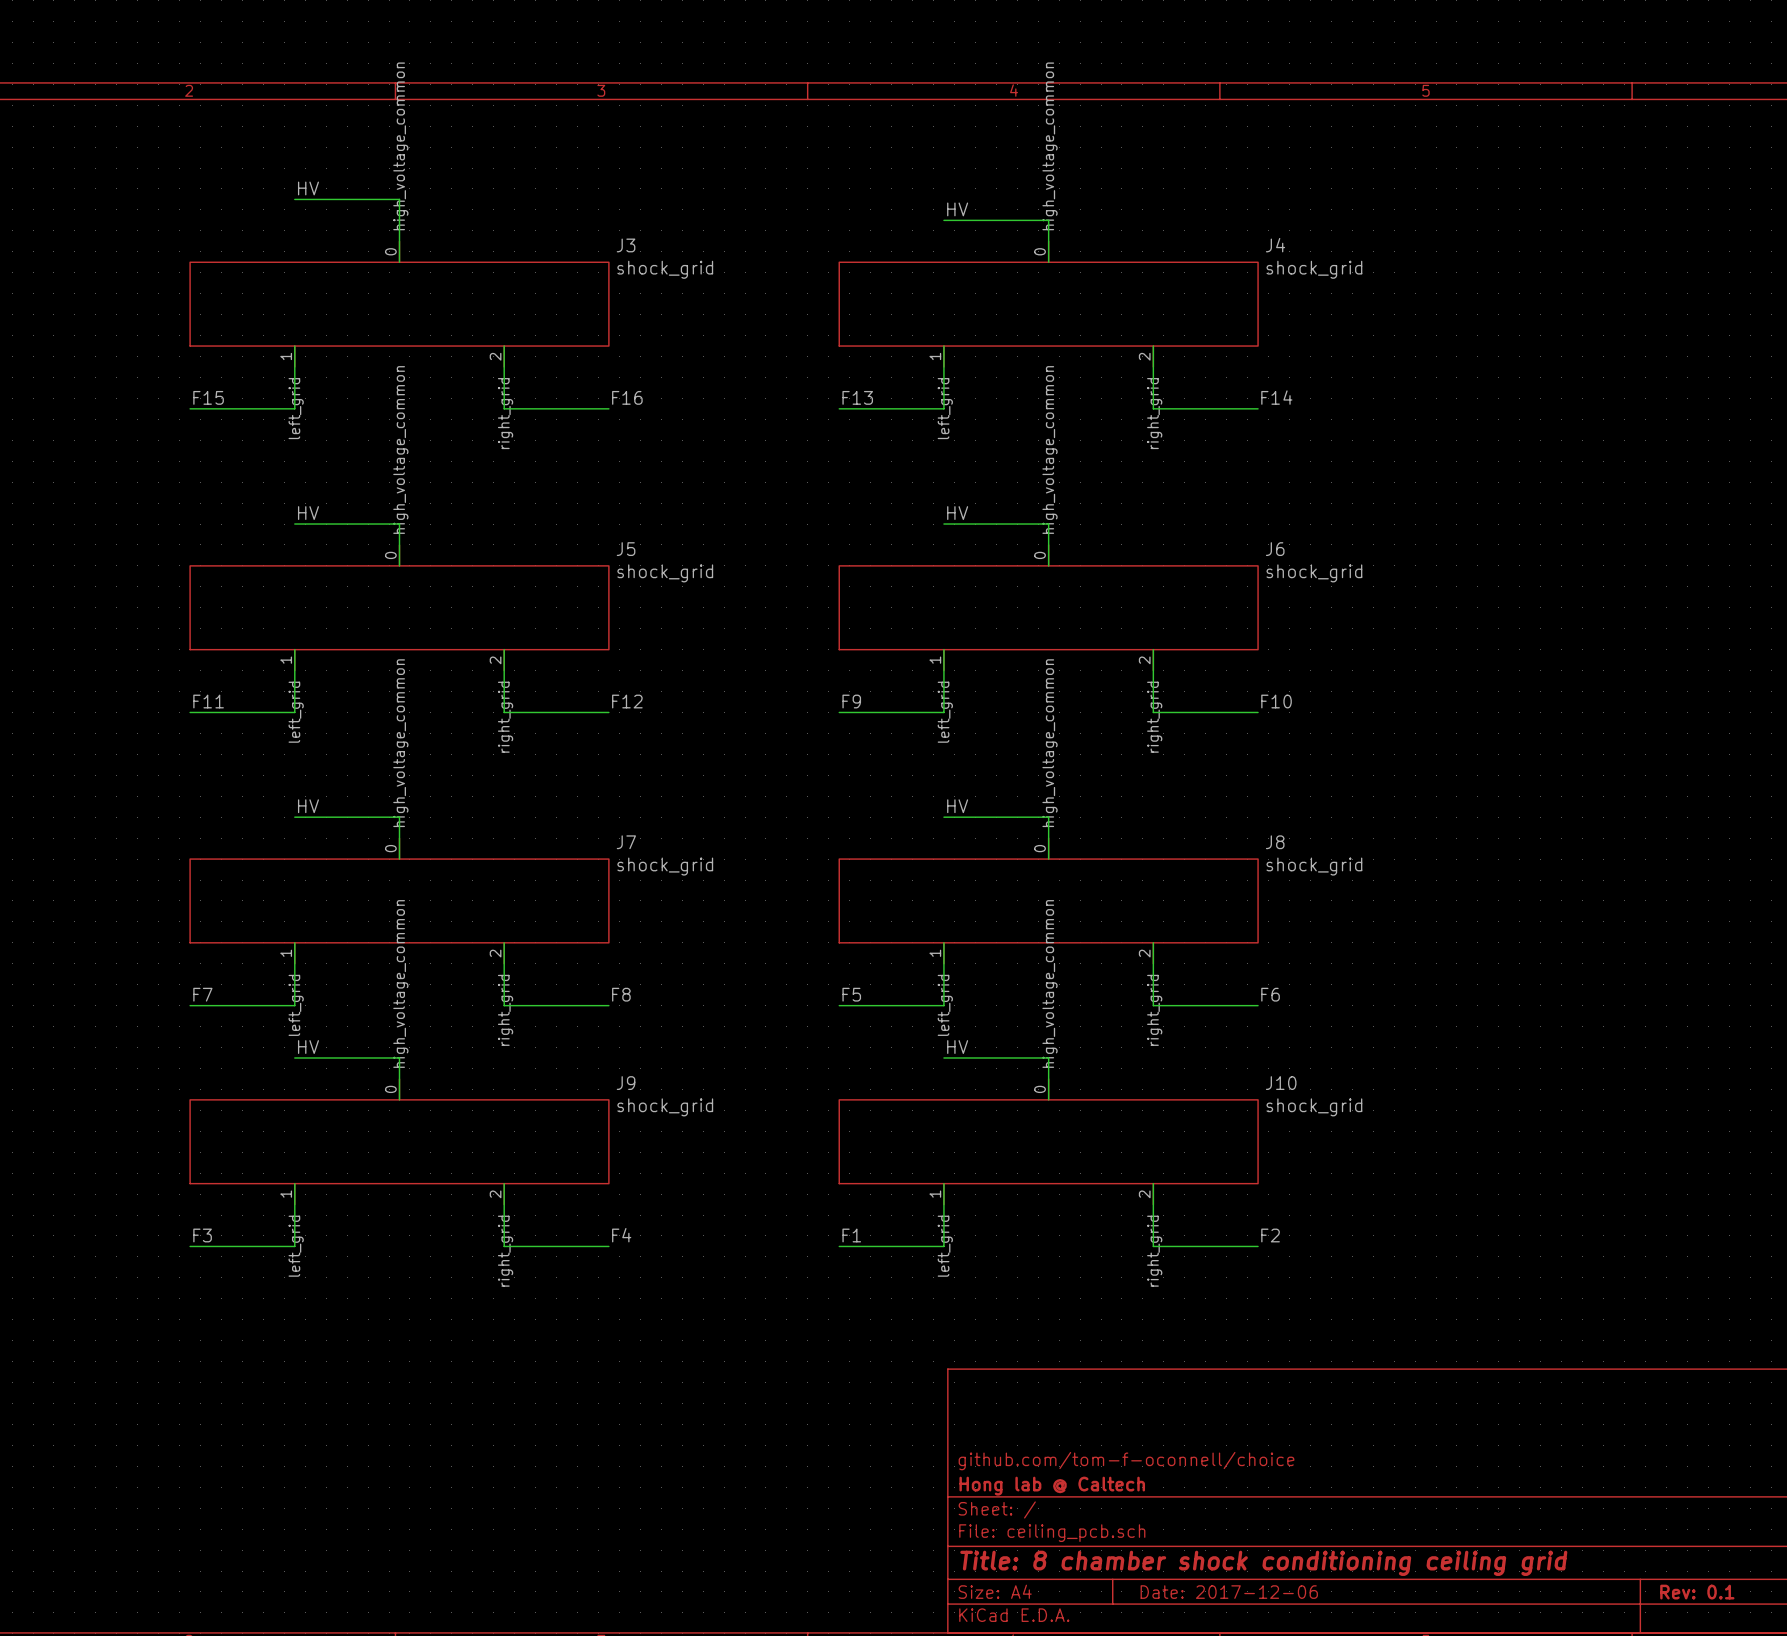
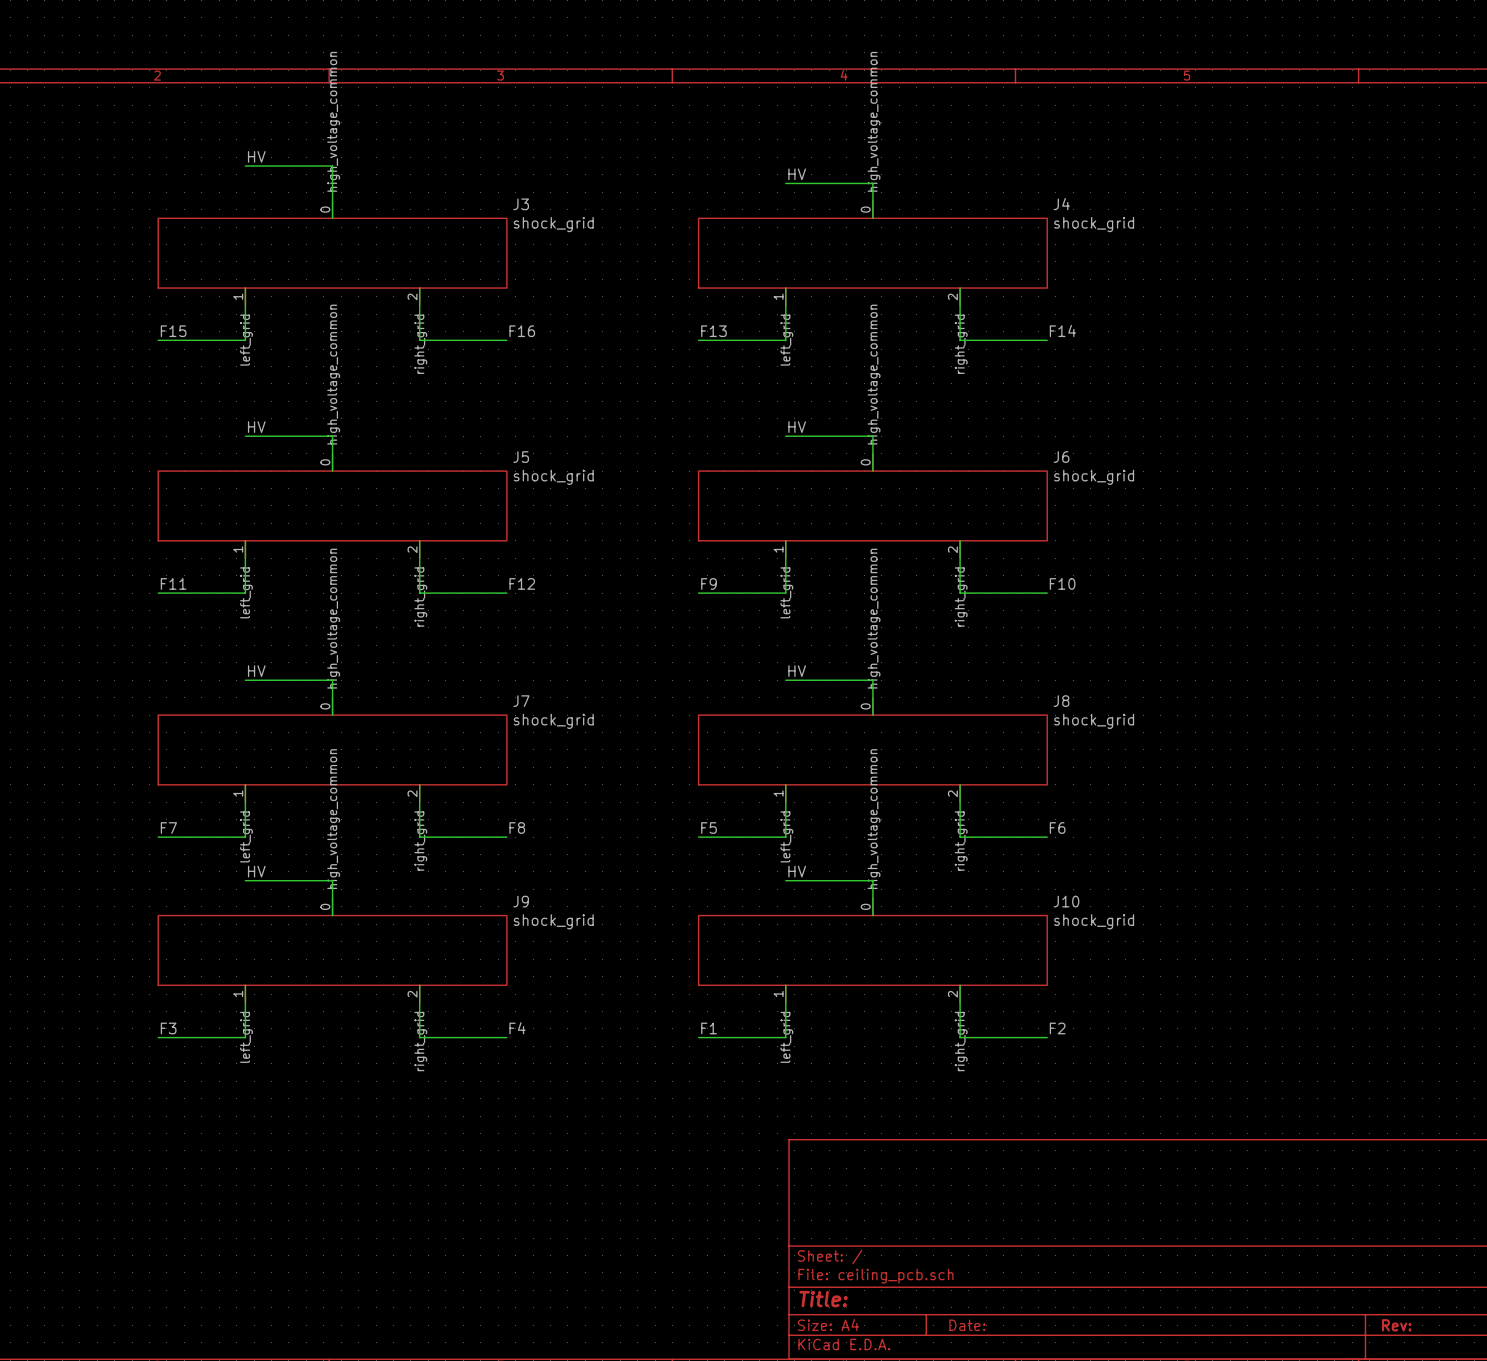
title block: github.com/tom-f-oconnell/choice (1126, 1461) -> none
title block: Hong lab @ Caltech (1052, 1486) -> none
title block: Title: 8 chamber shock conditioning ceiling grid (1263, 1563) -> Title: (823, 1299)
title block: Date: 2017-12-06 (1229, 1592) -> Date: (967, 1325)
title block: Rev: 0.1 (1697, 1592) -> Rev: (1396, 1325)

